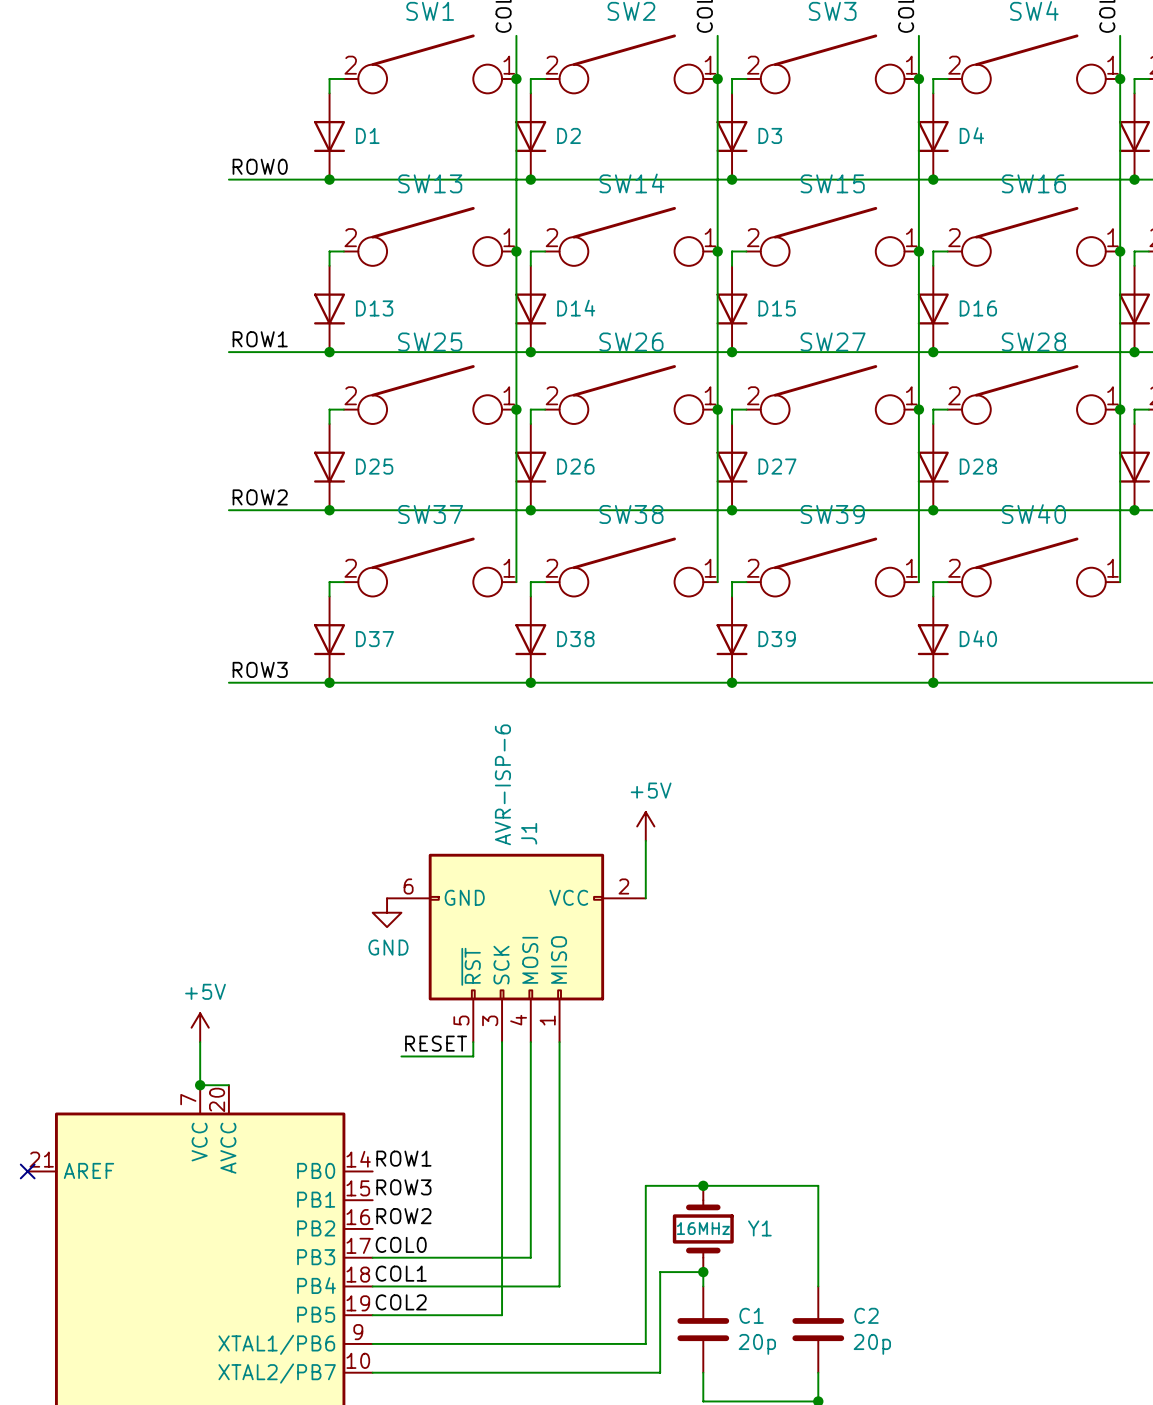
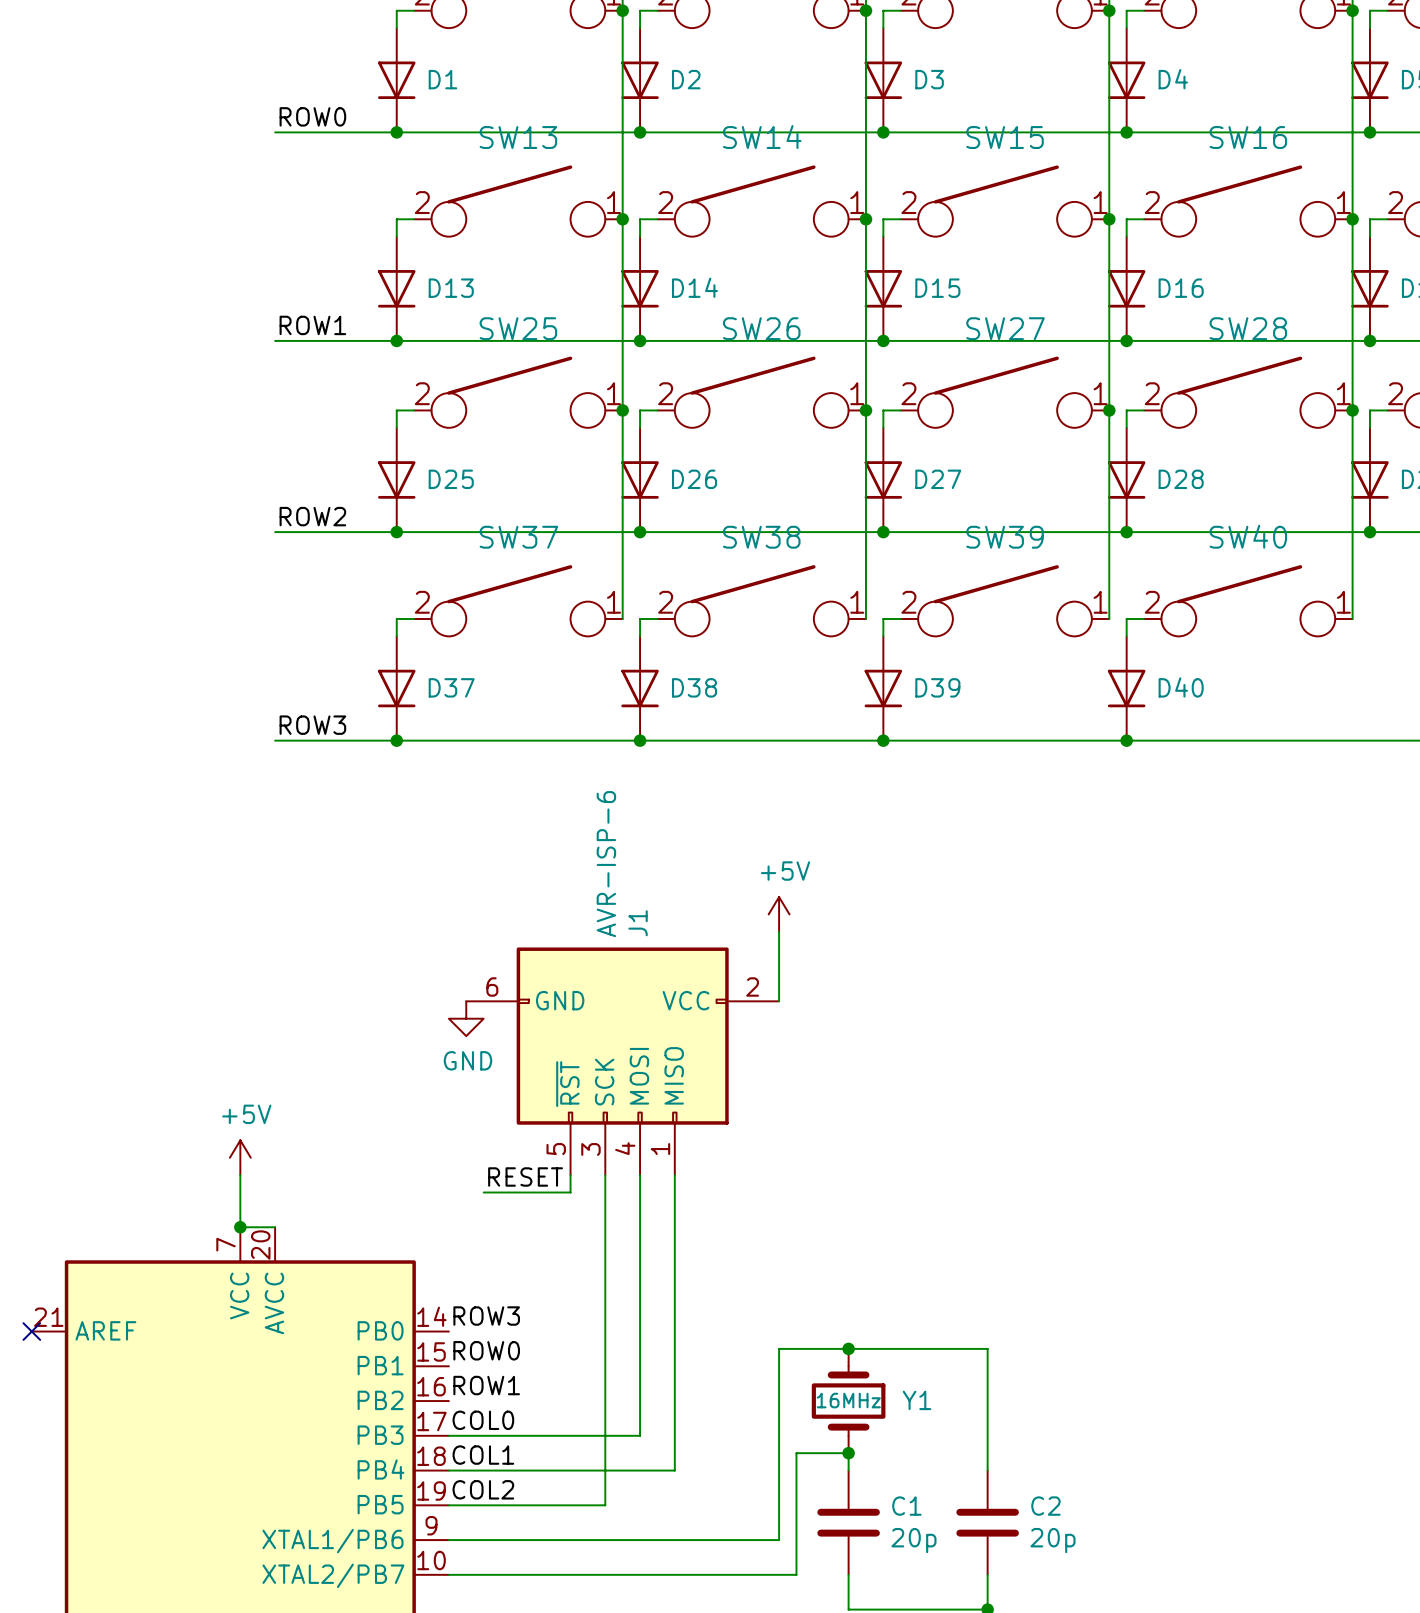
label: ROW1 (403, 1158) -> ROW3 (486, 1316)
label: ROW3 (403, 1187) -> ROW0 (486, 1350)
label: ROW2 (403, 1216) -> ROW1 (486, 1385)

